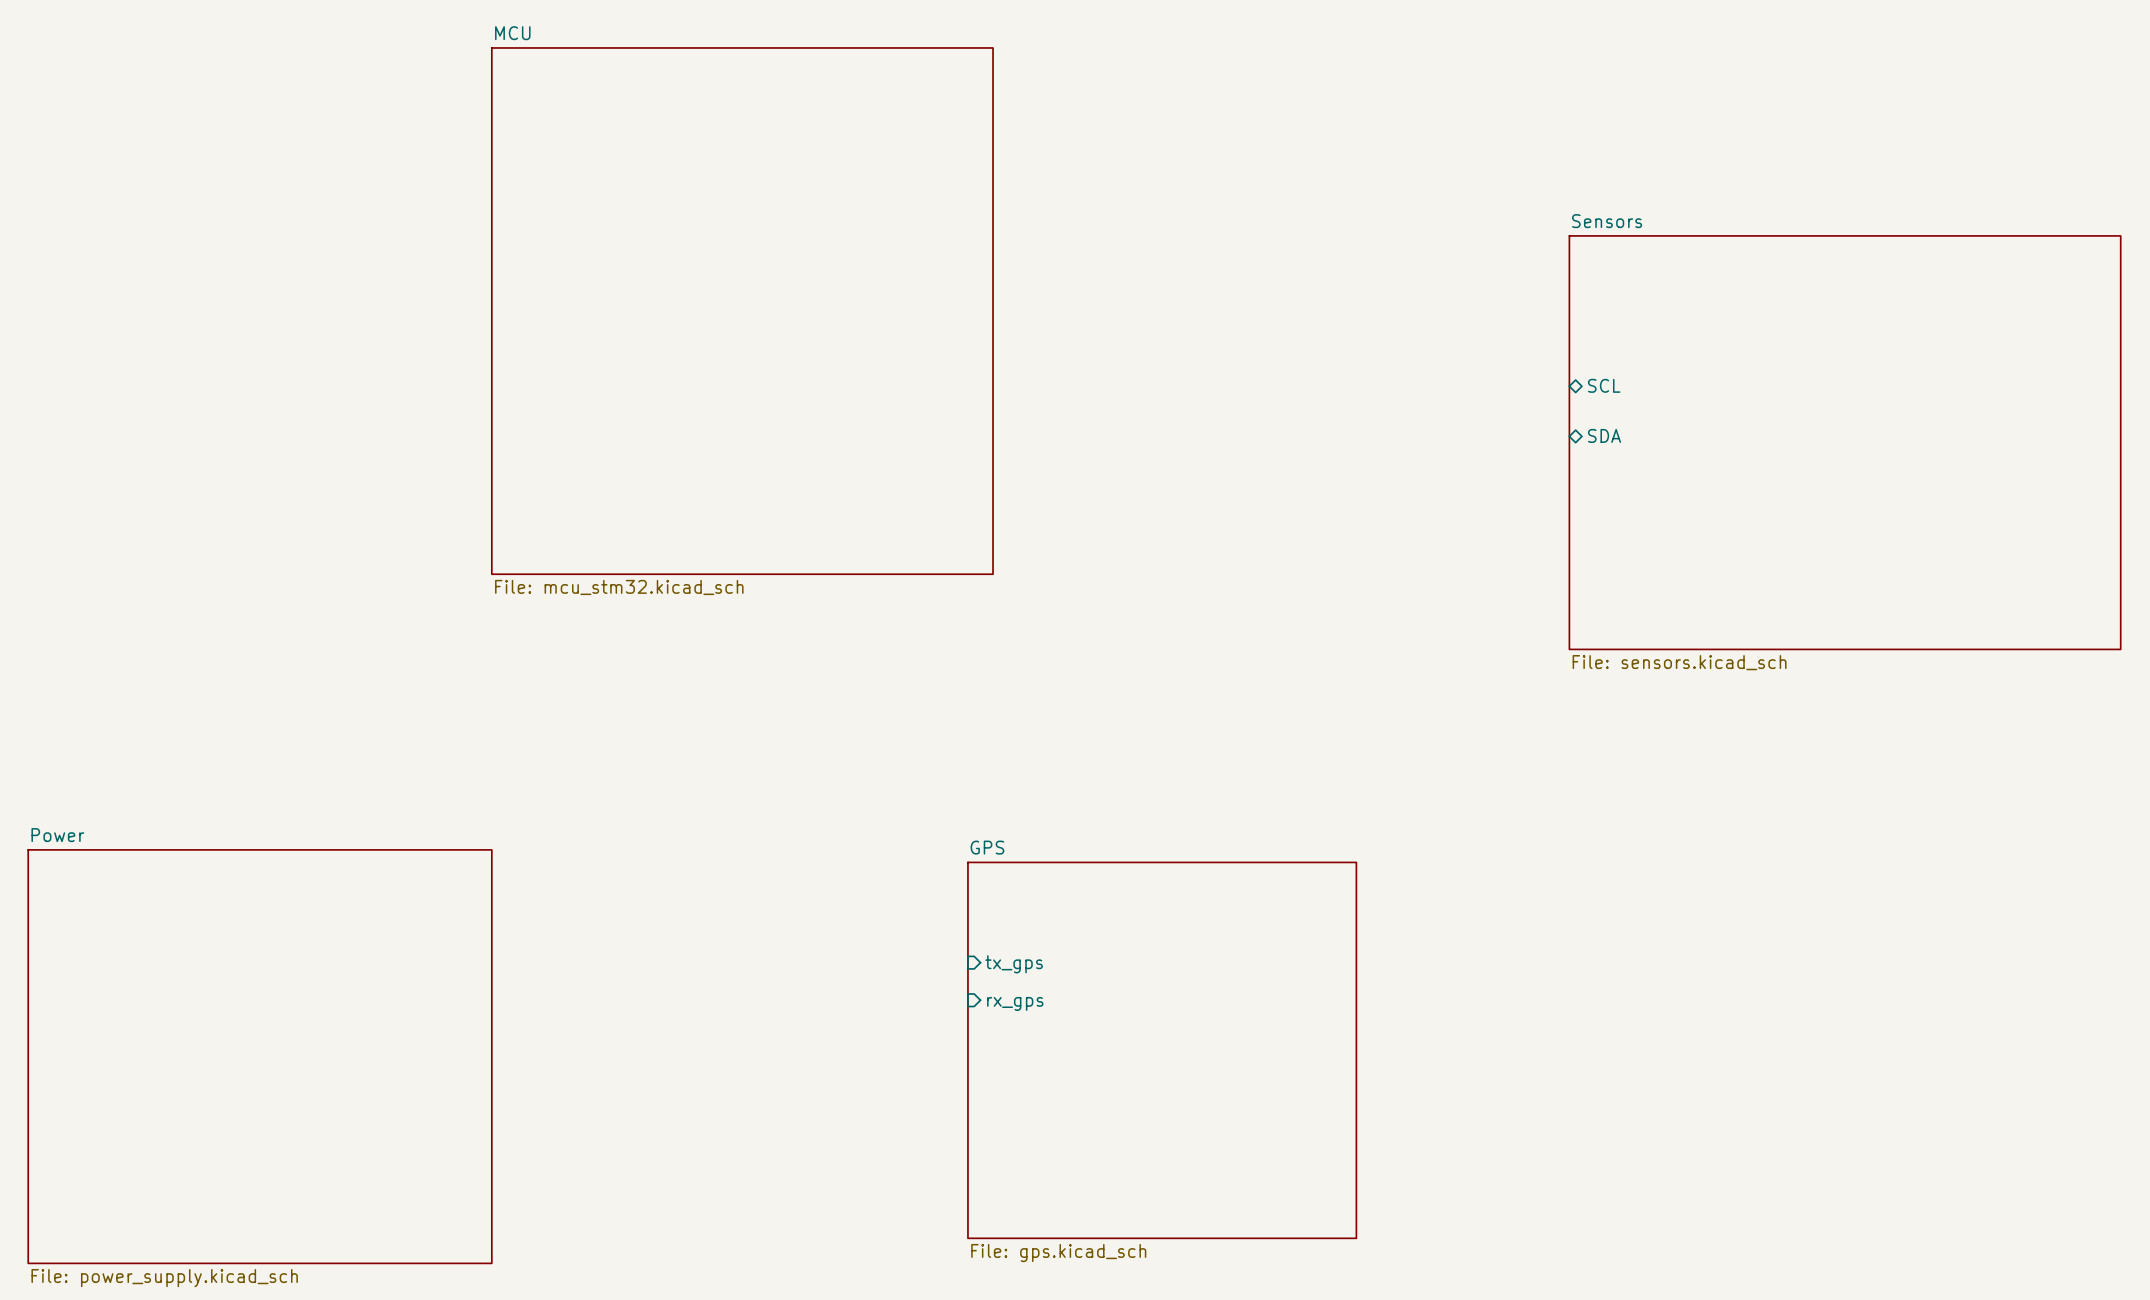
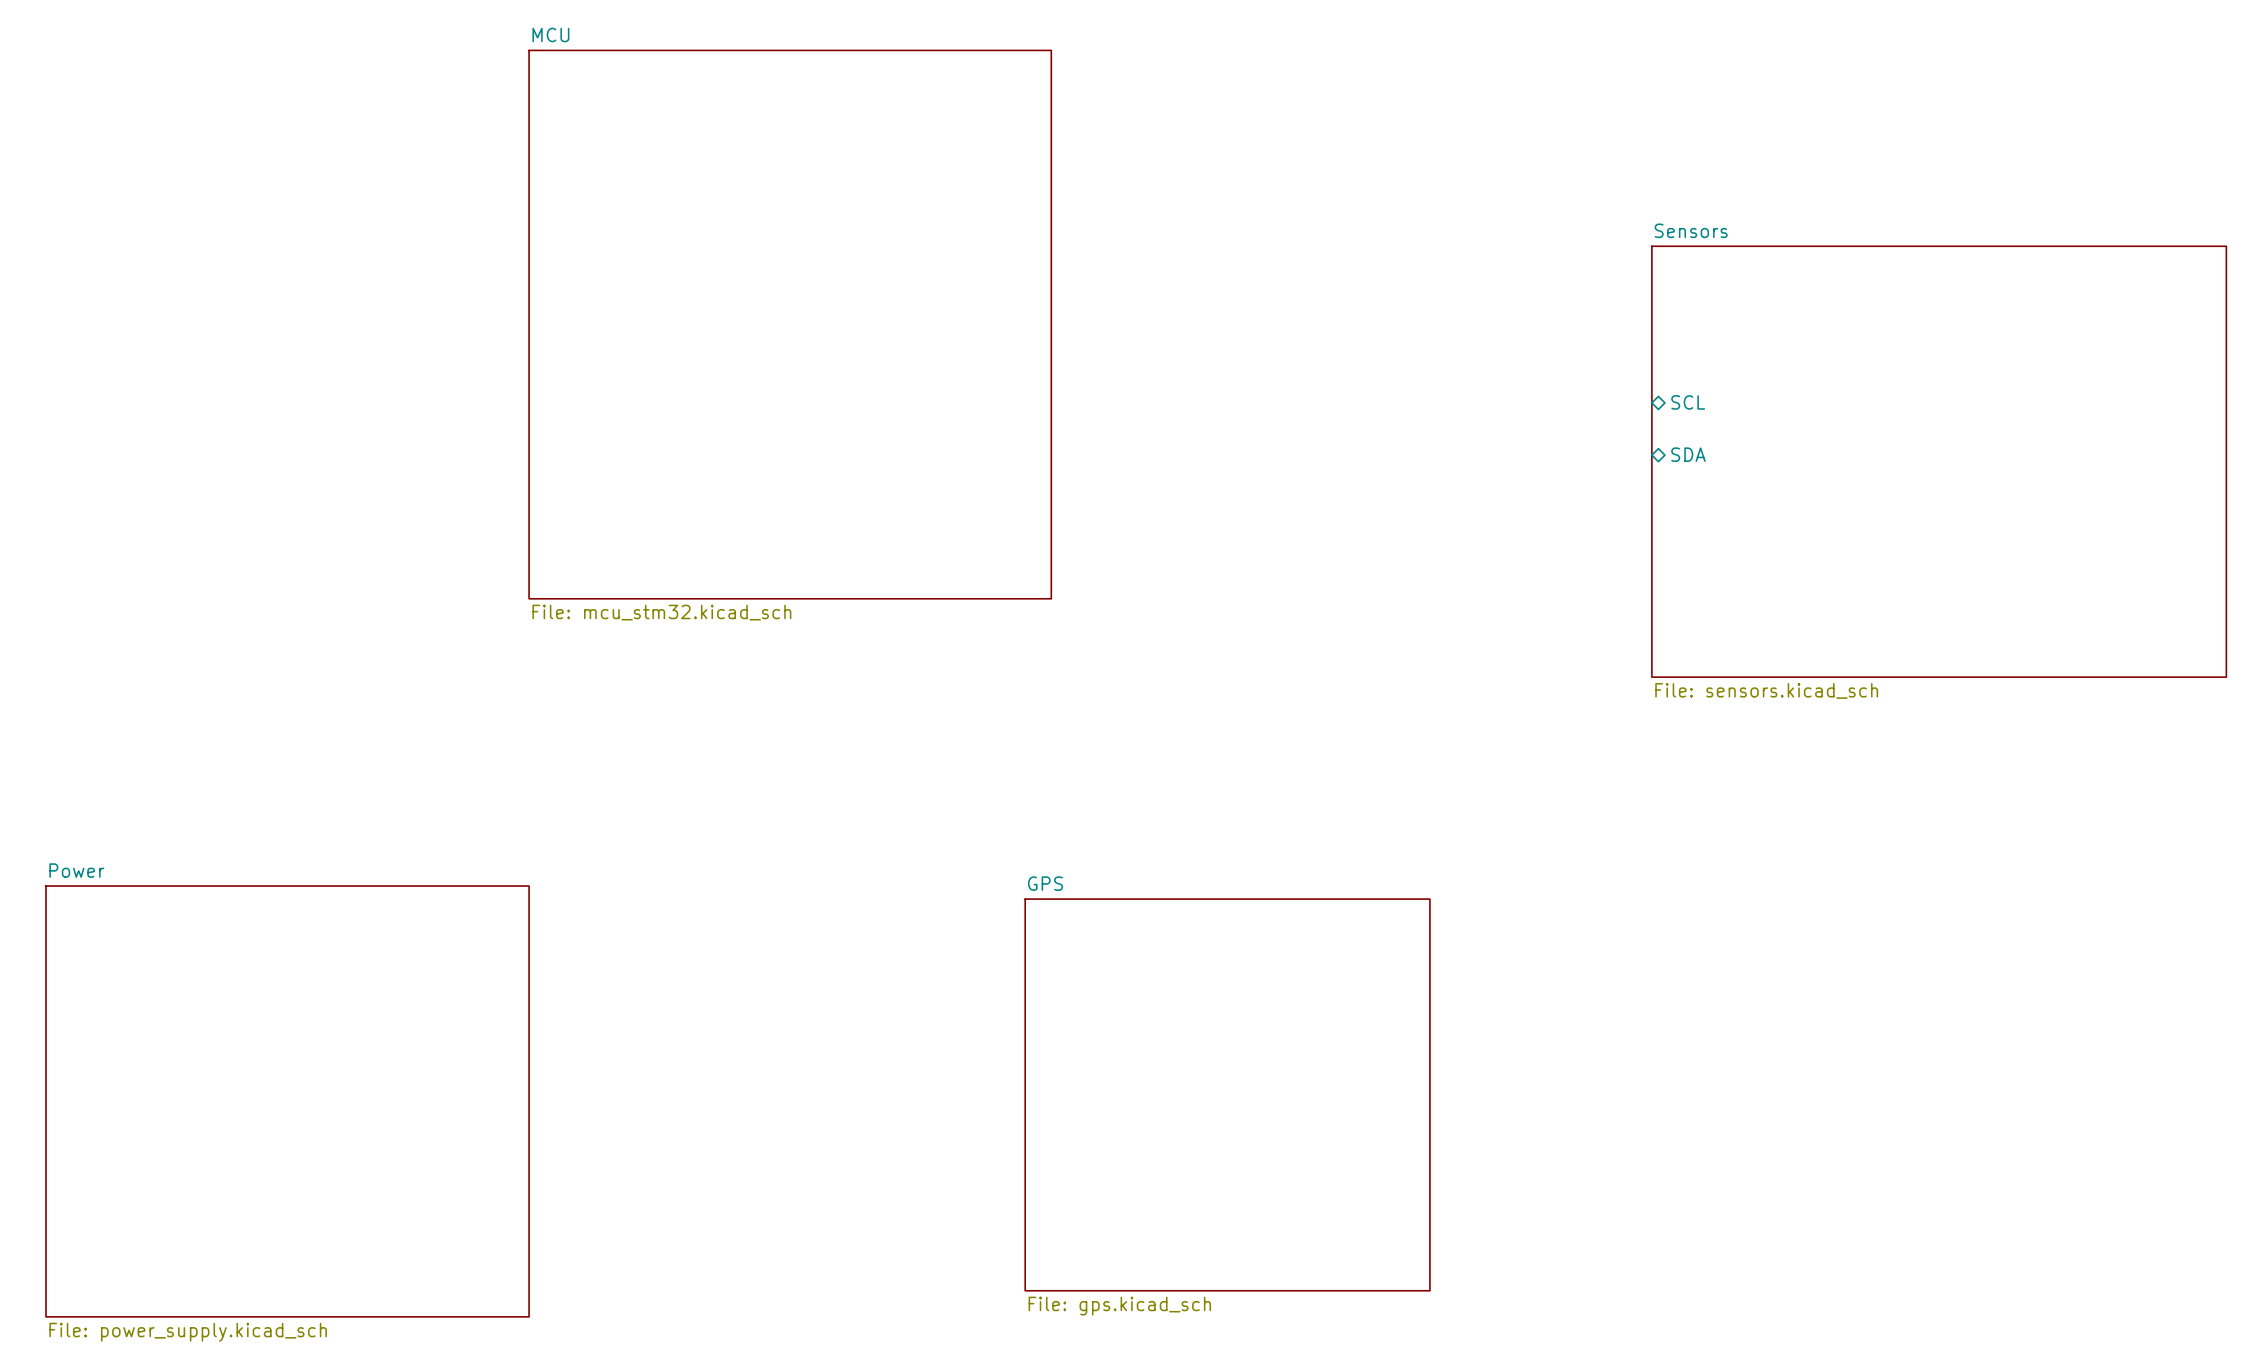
sheet pin: tx_gps (1014, 964) -> none
sheet pin: rx_gps (1015, 1003) -> none

